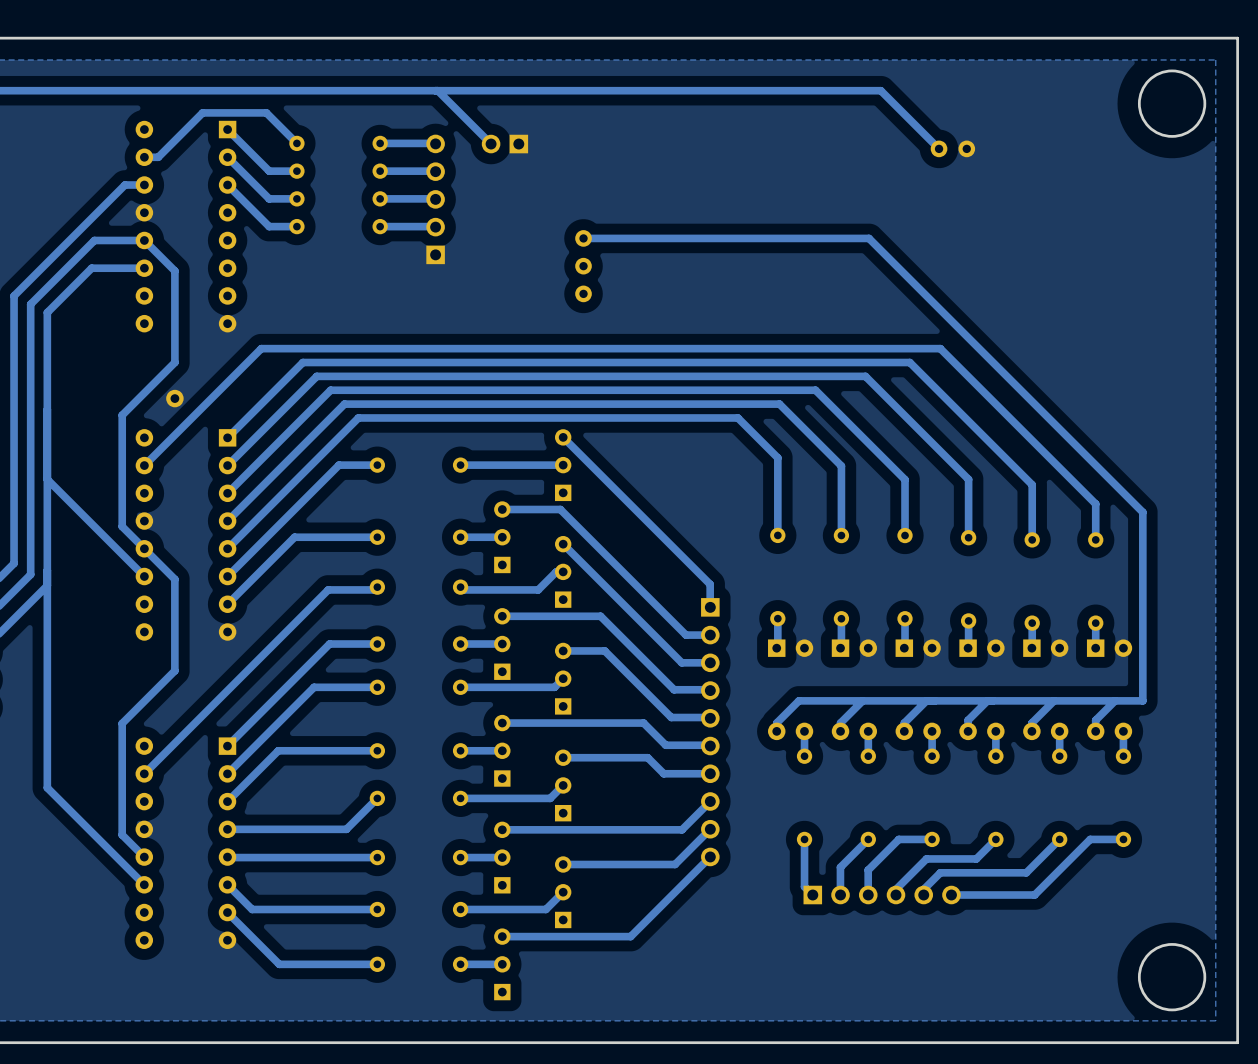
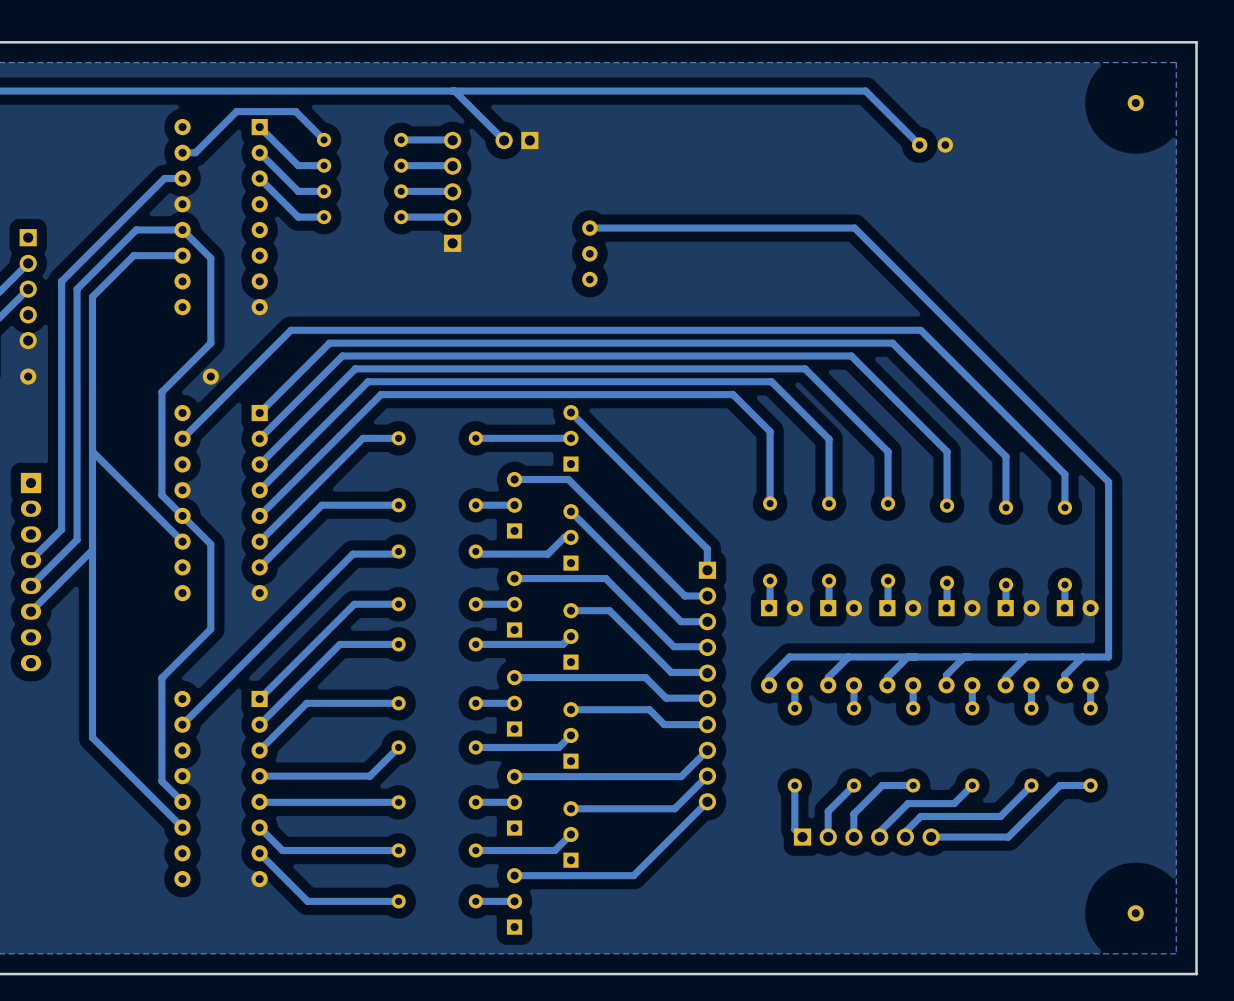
round board edge: [1137, 69, 1207, 138] -> none
part: none -> (1135, 103)
round board edge: [1137, 943, 1207, 1012] -> none
part: none -> (1135, 913)

